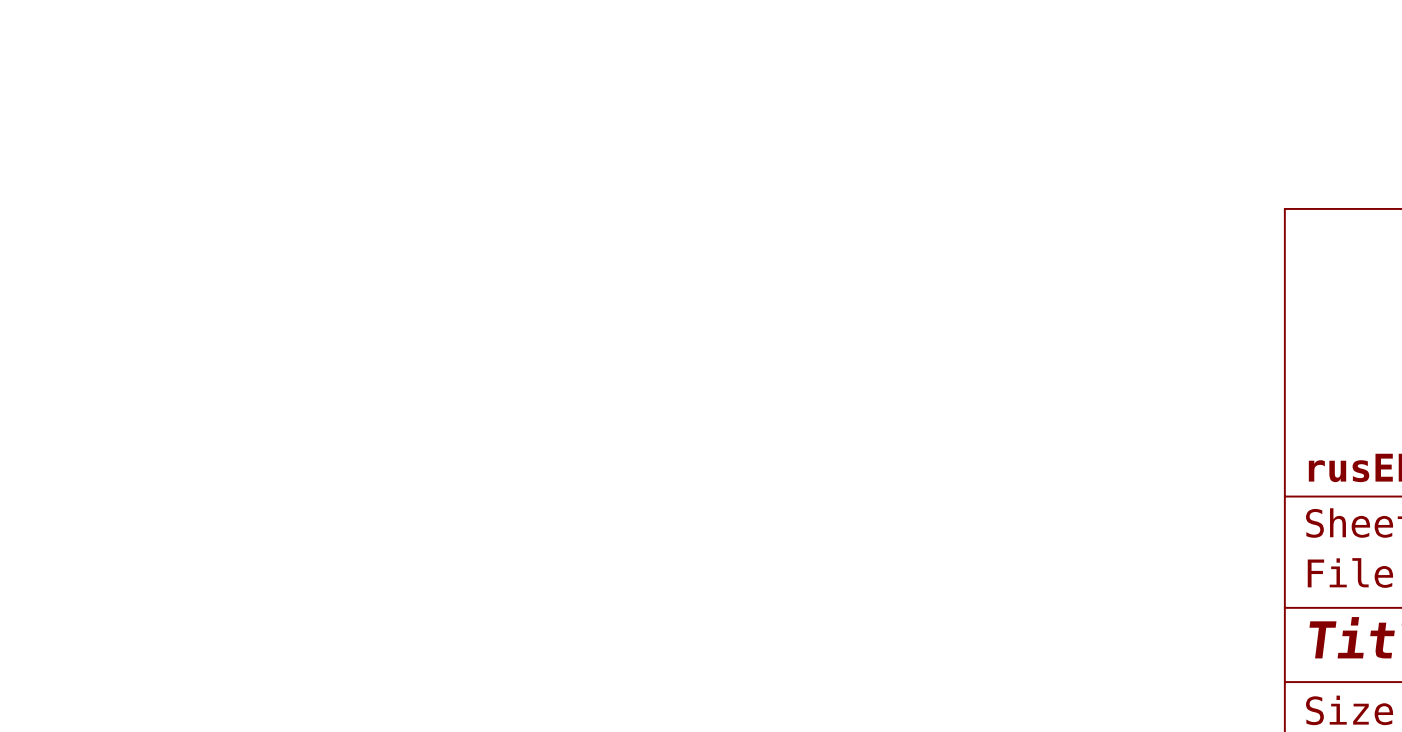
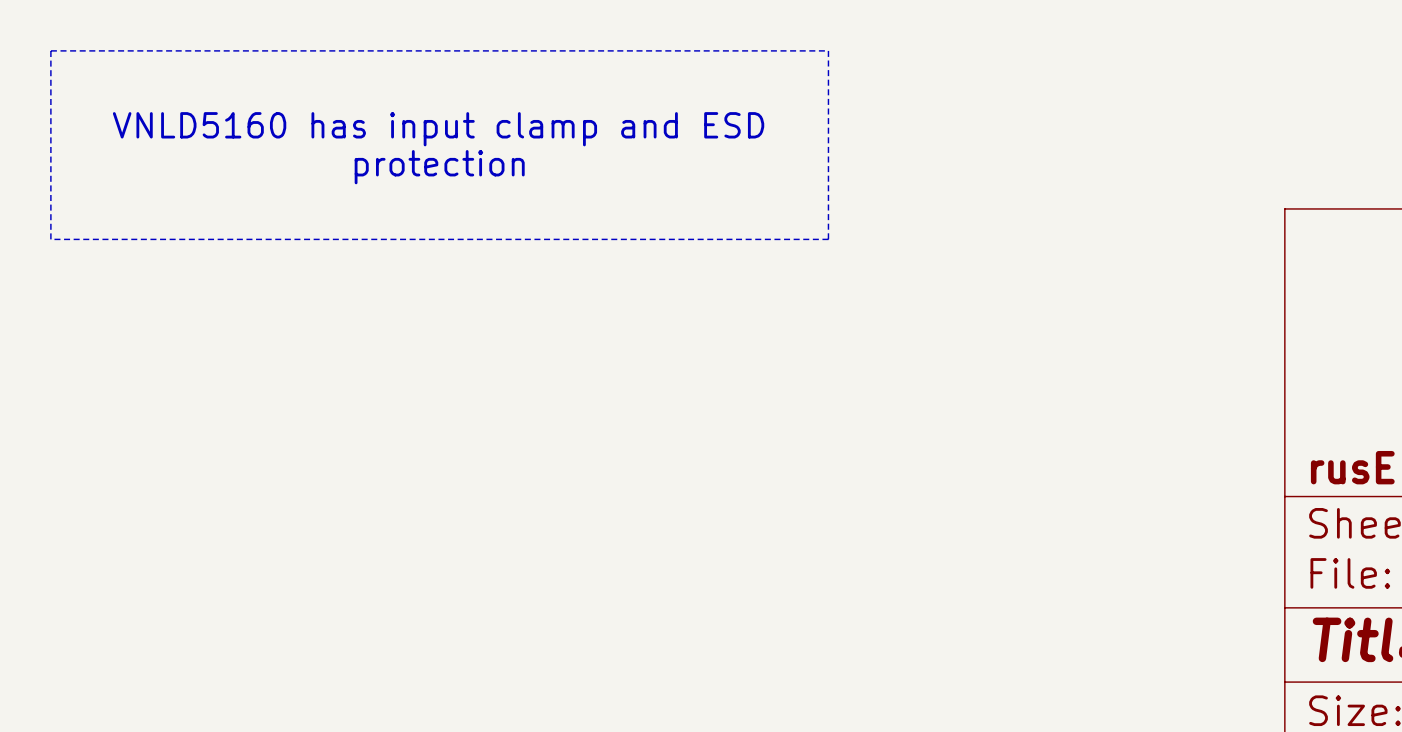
line: none -> (50, 50) (828, 50) (828, 239) (50, 239) (50, 50)
text: none -> VNLD5160 has input clamp and ESD (438, 129)
text: none -> protection (439, 167)

